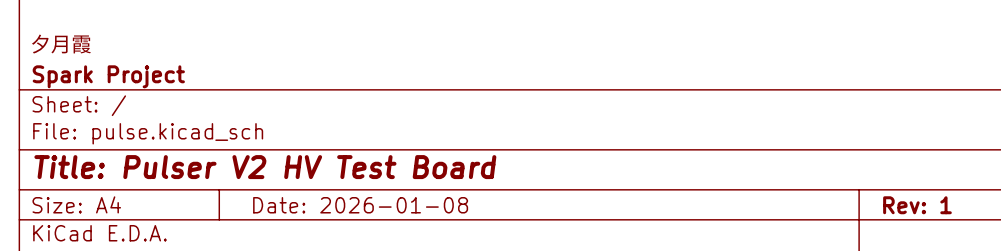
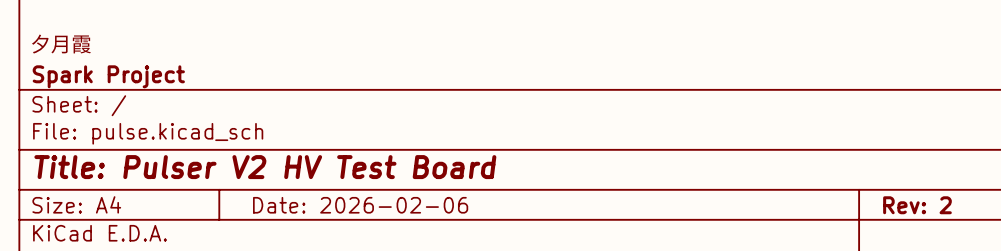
title block: Date: 2026-01-08 (360, 205) -> Date: 2026-02-06 (360, 205)
title block: Rev: 1 (917, 205) -> Rev: 2 (917, 205)

